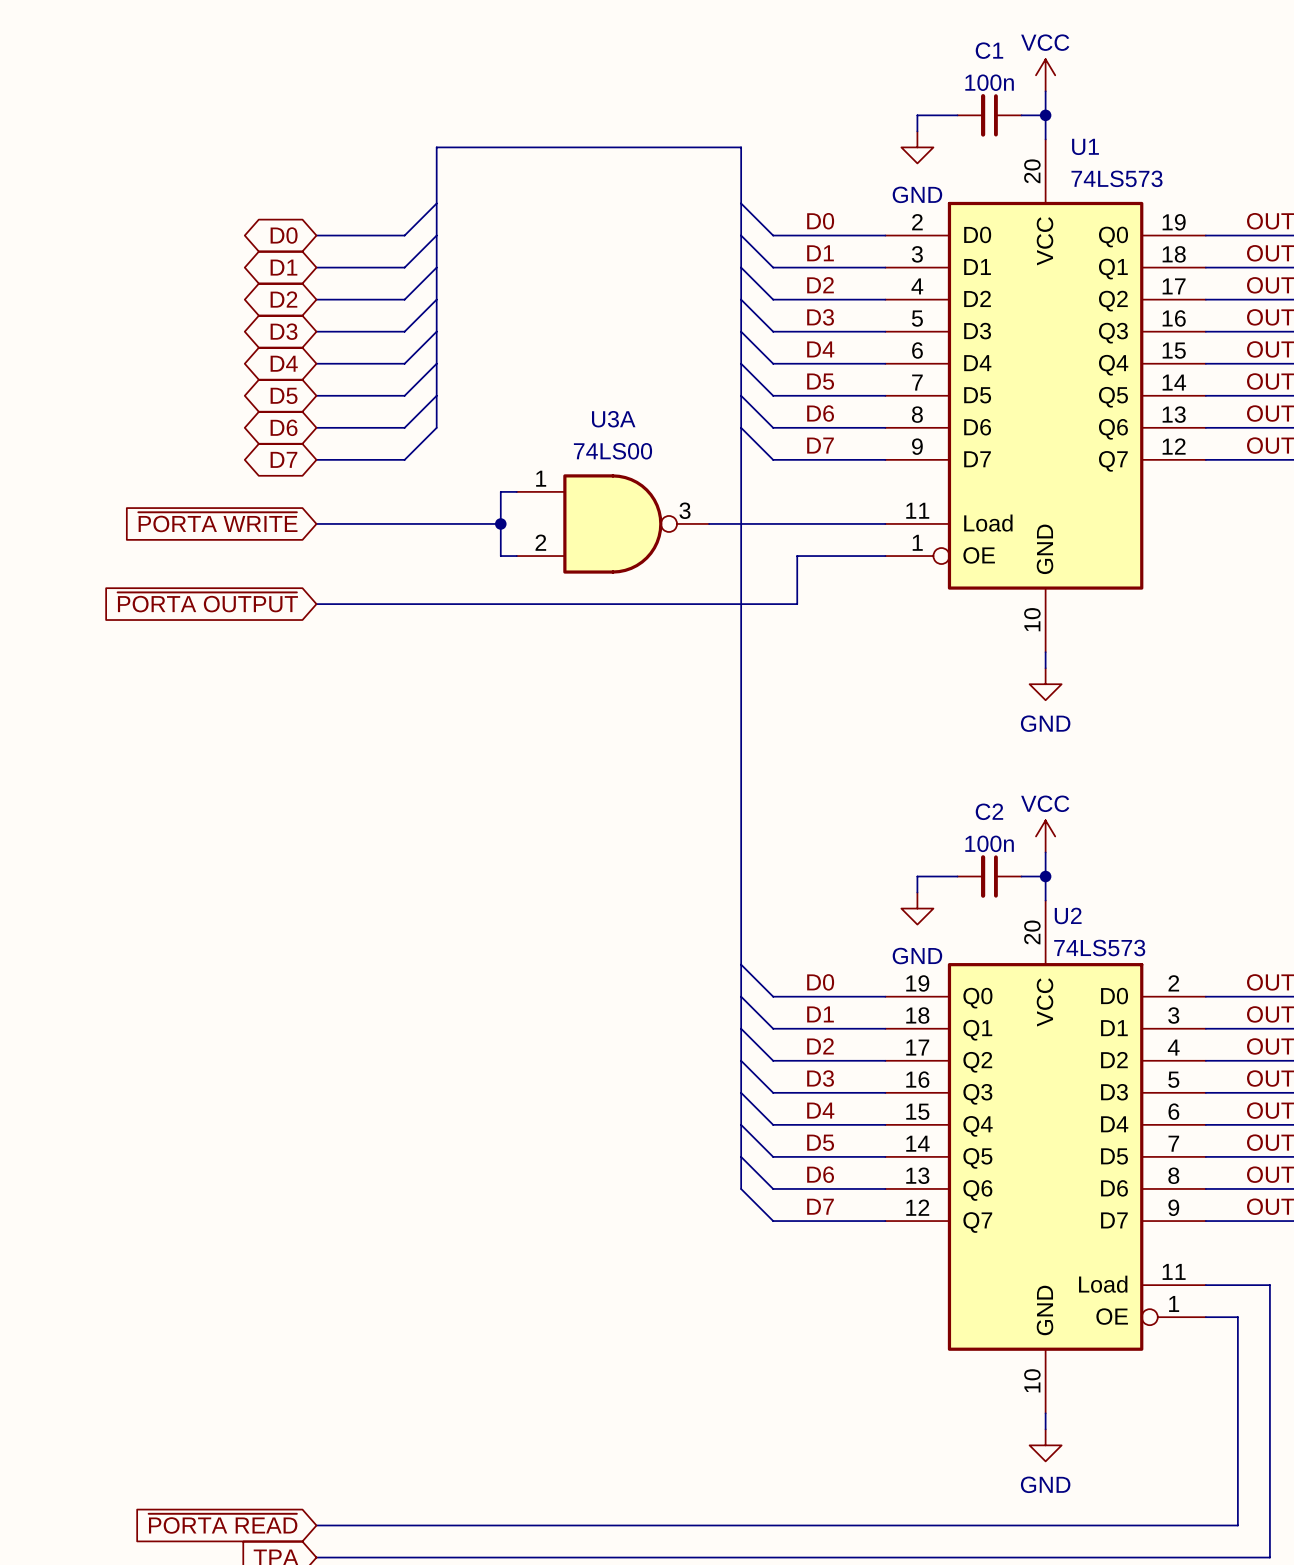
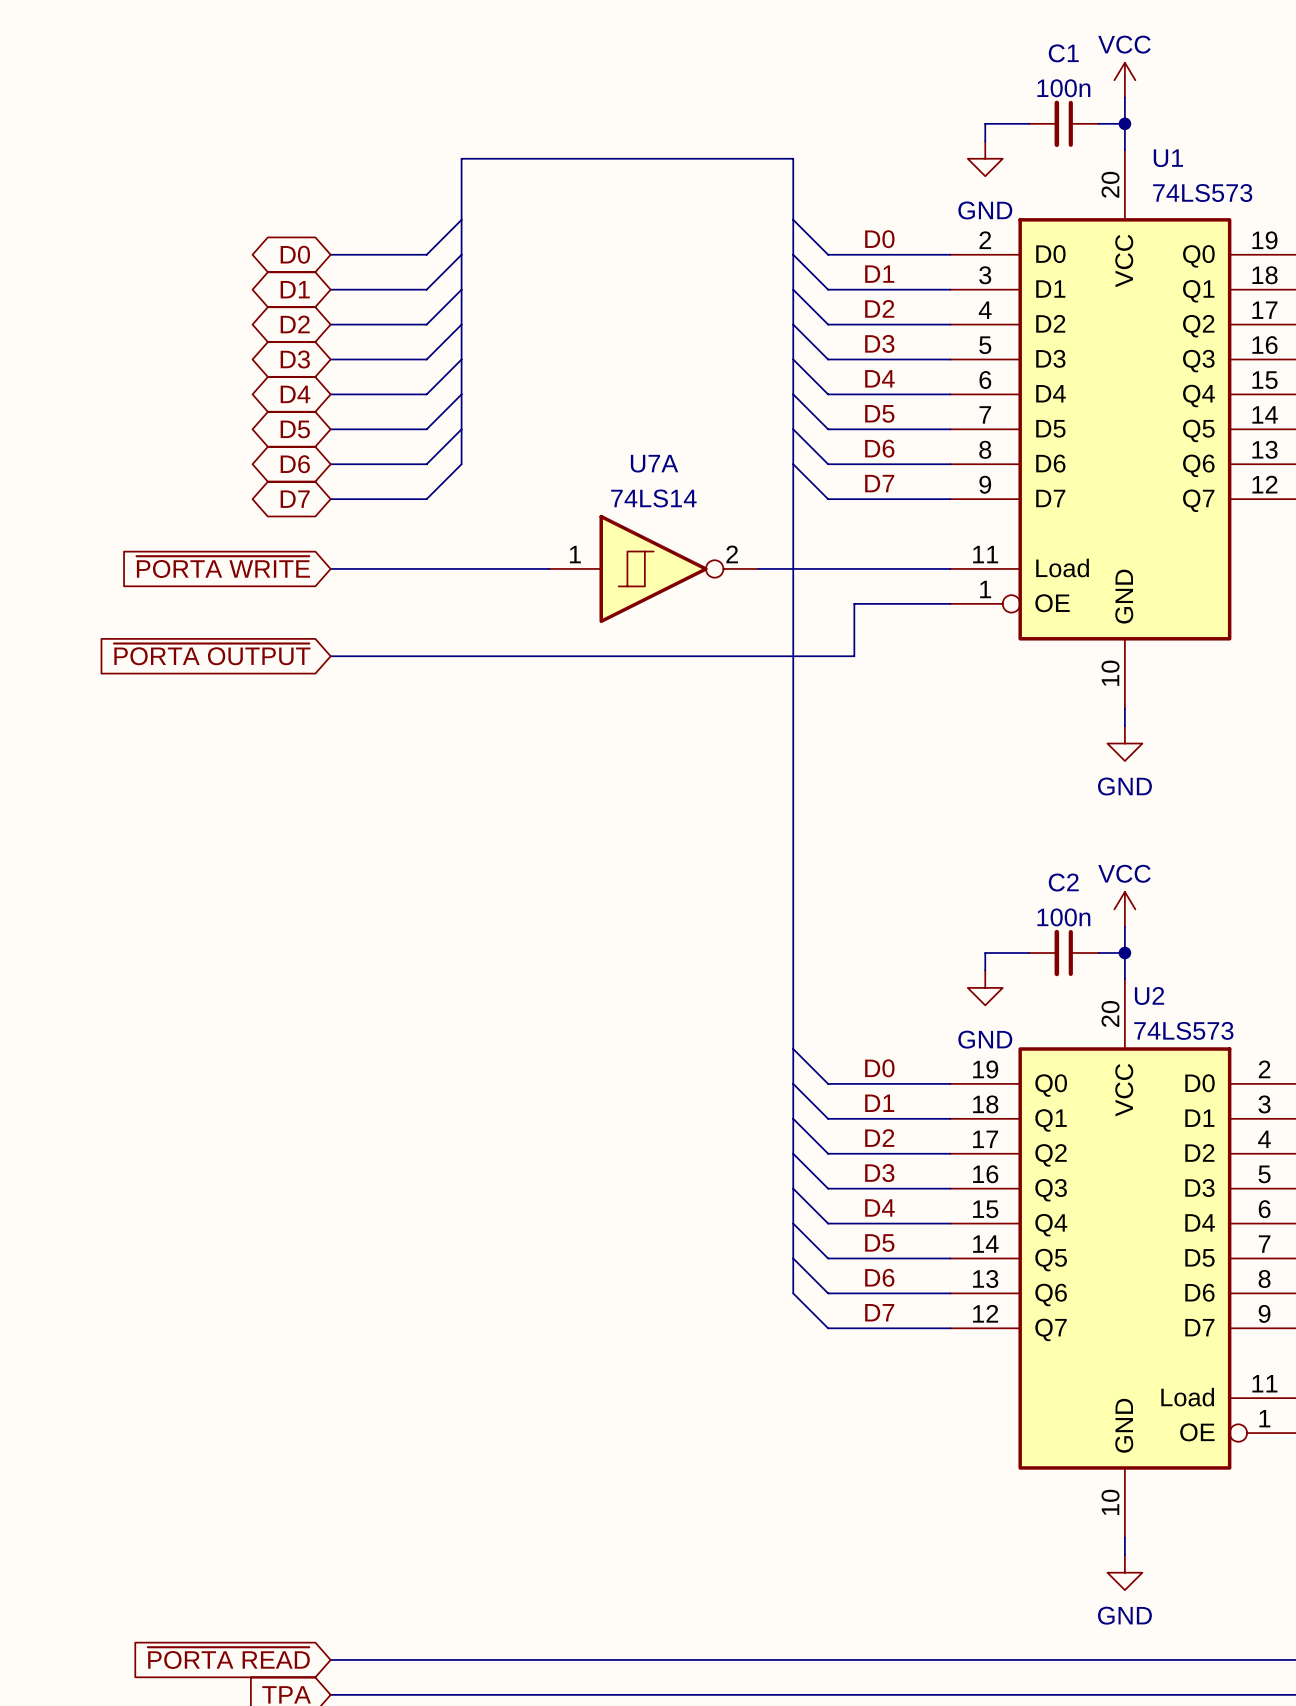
wire: (516, 491) (500, 491) (500, 556) (516, 556) -> none
wire: none -> (531, 568) (548, 568)
junction: (500, 523) -> none
U3A: 74LS00 (612, 523) -> none
U7A: none -> 74LS14 (653, 568)

